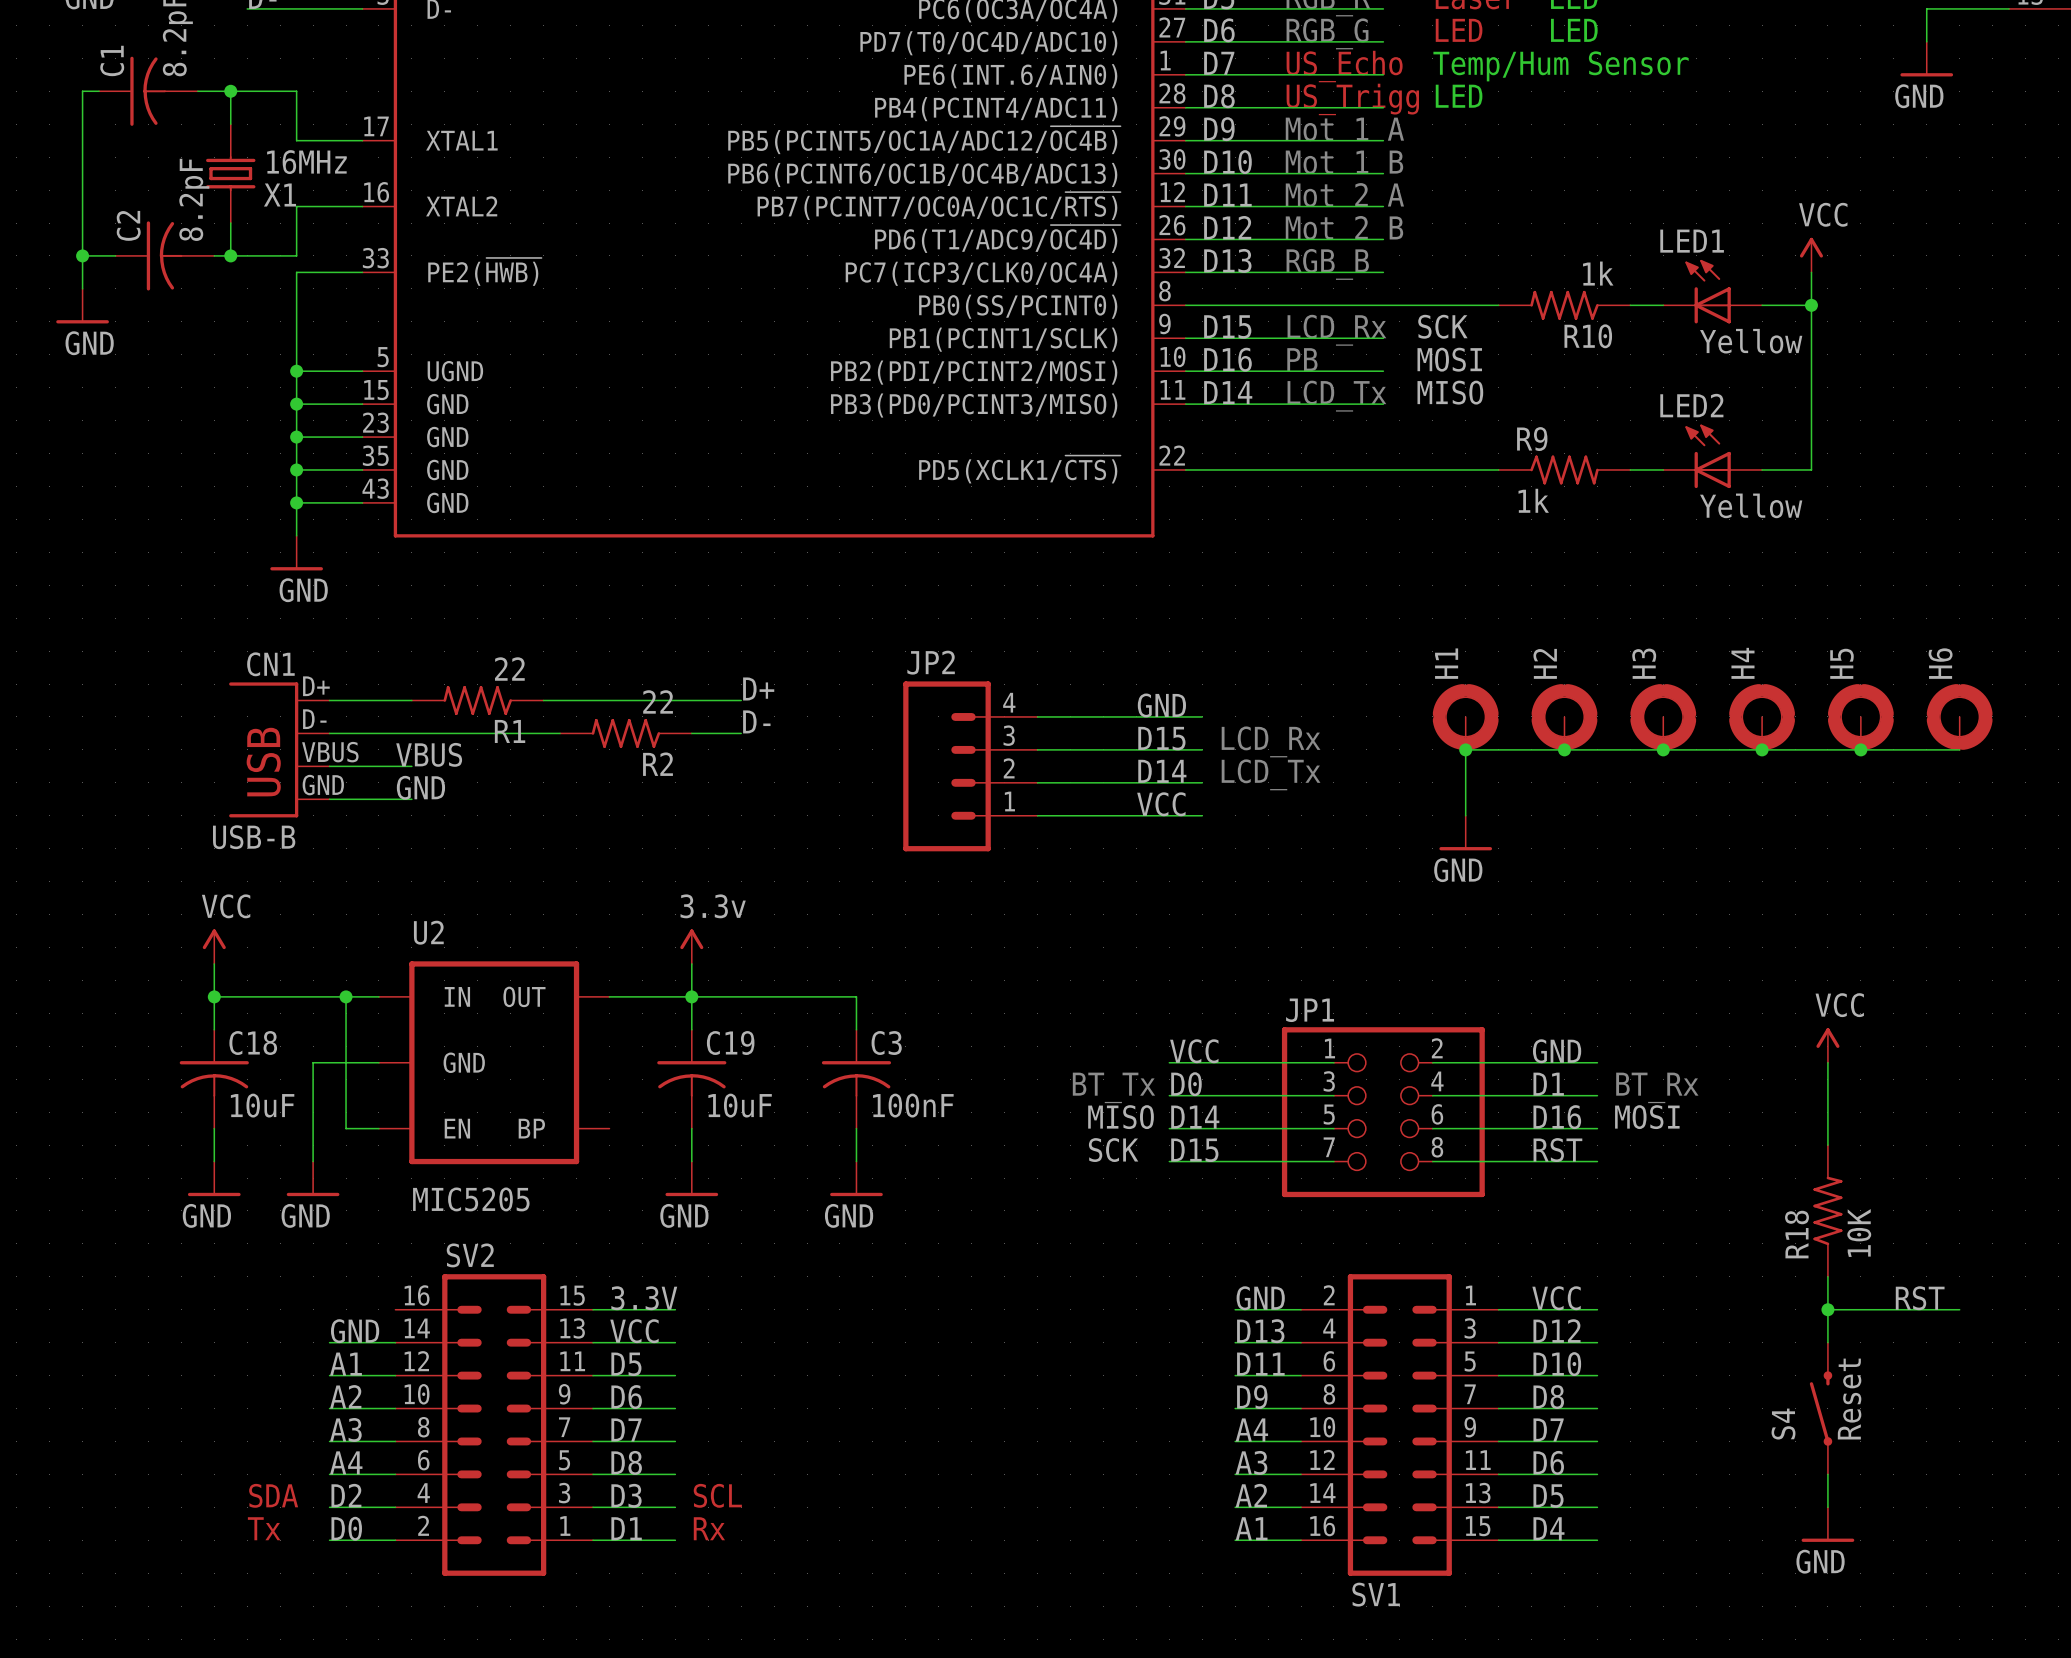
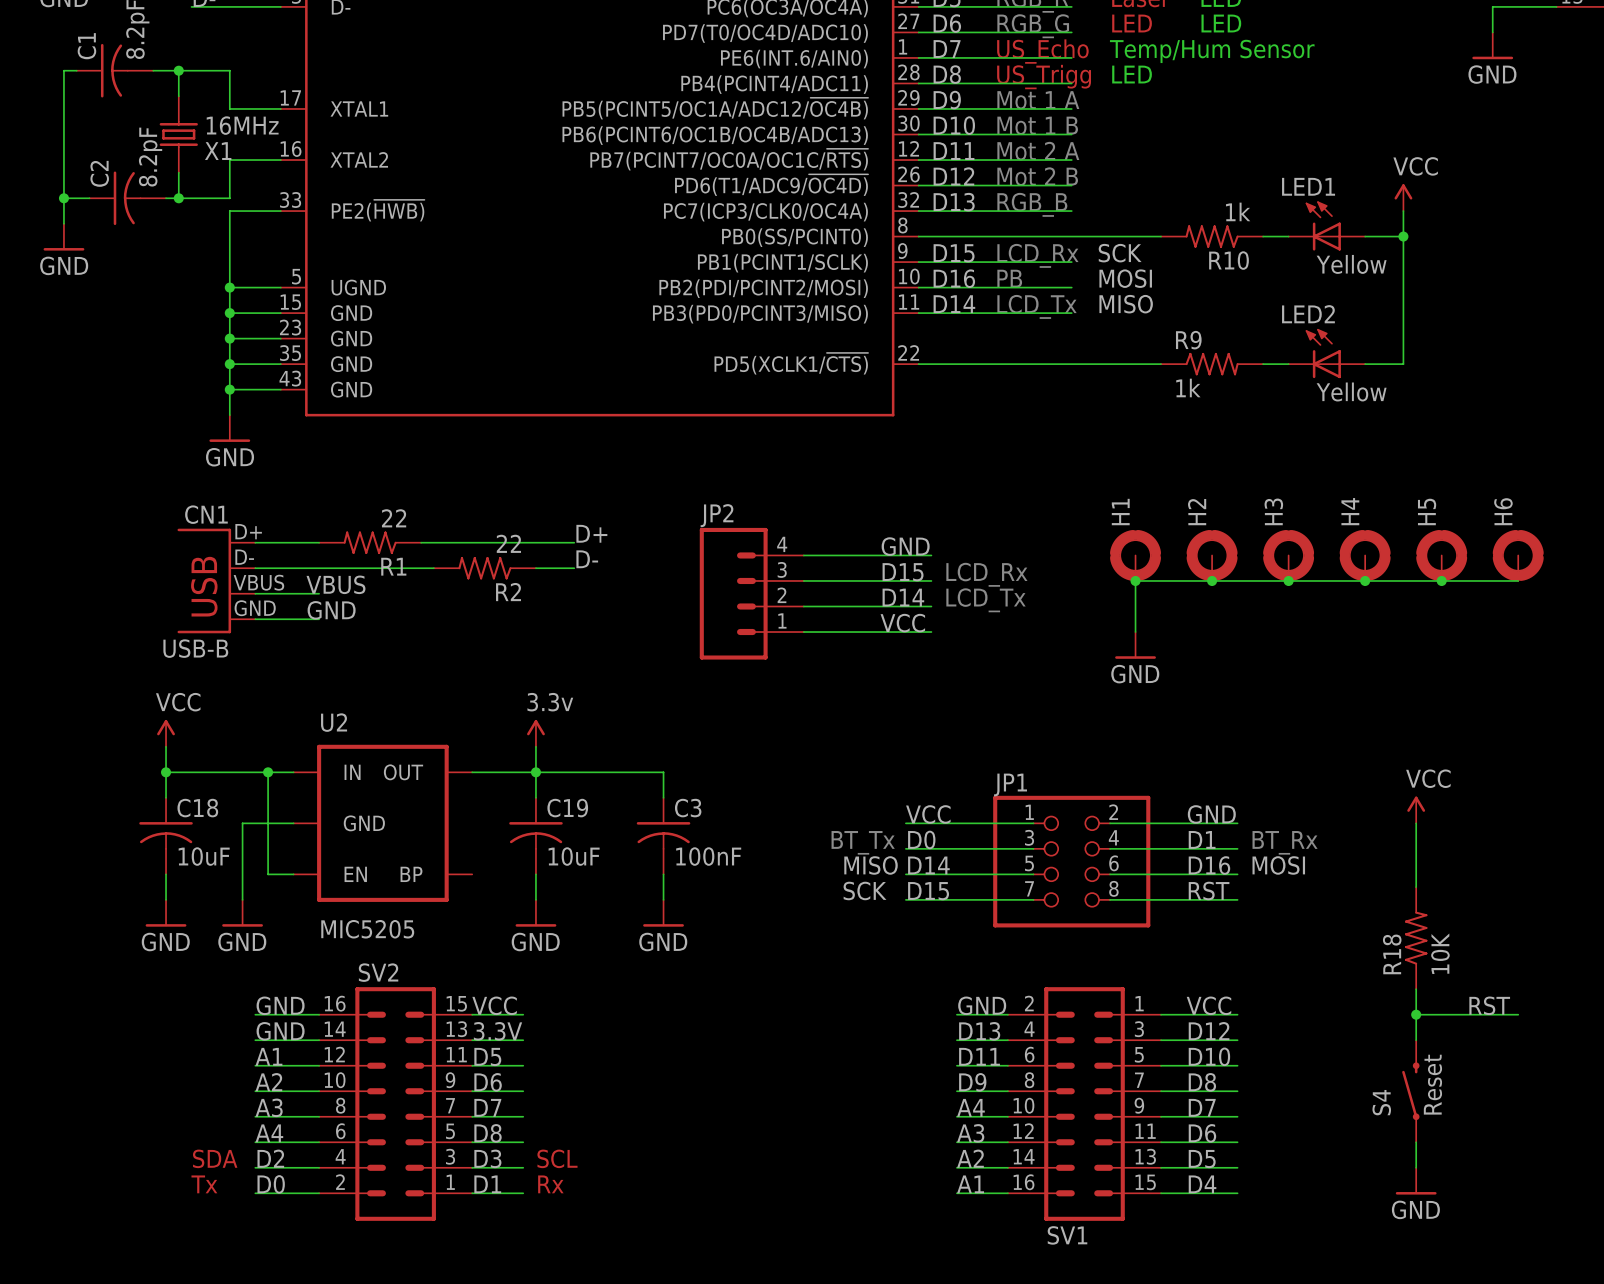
label: none -> GND (280, 1005)
label: 3.3V (644, 1298) -> VCC (494, 1005)
wire: none -> (255, 1014) (319, 1014)
label: VCC (634, 1331) -> 3.3V (498, 1031)
SV2 position: (494, 1425) -> (395, 1104)

